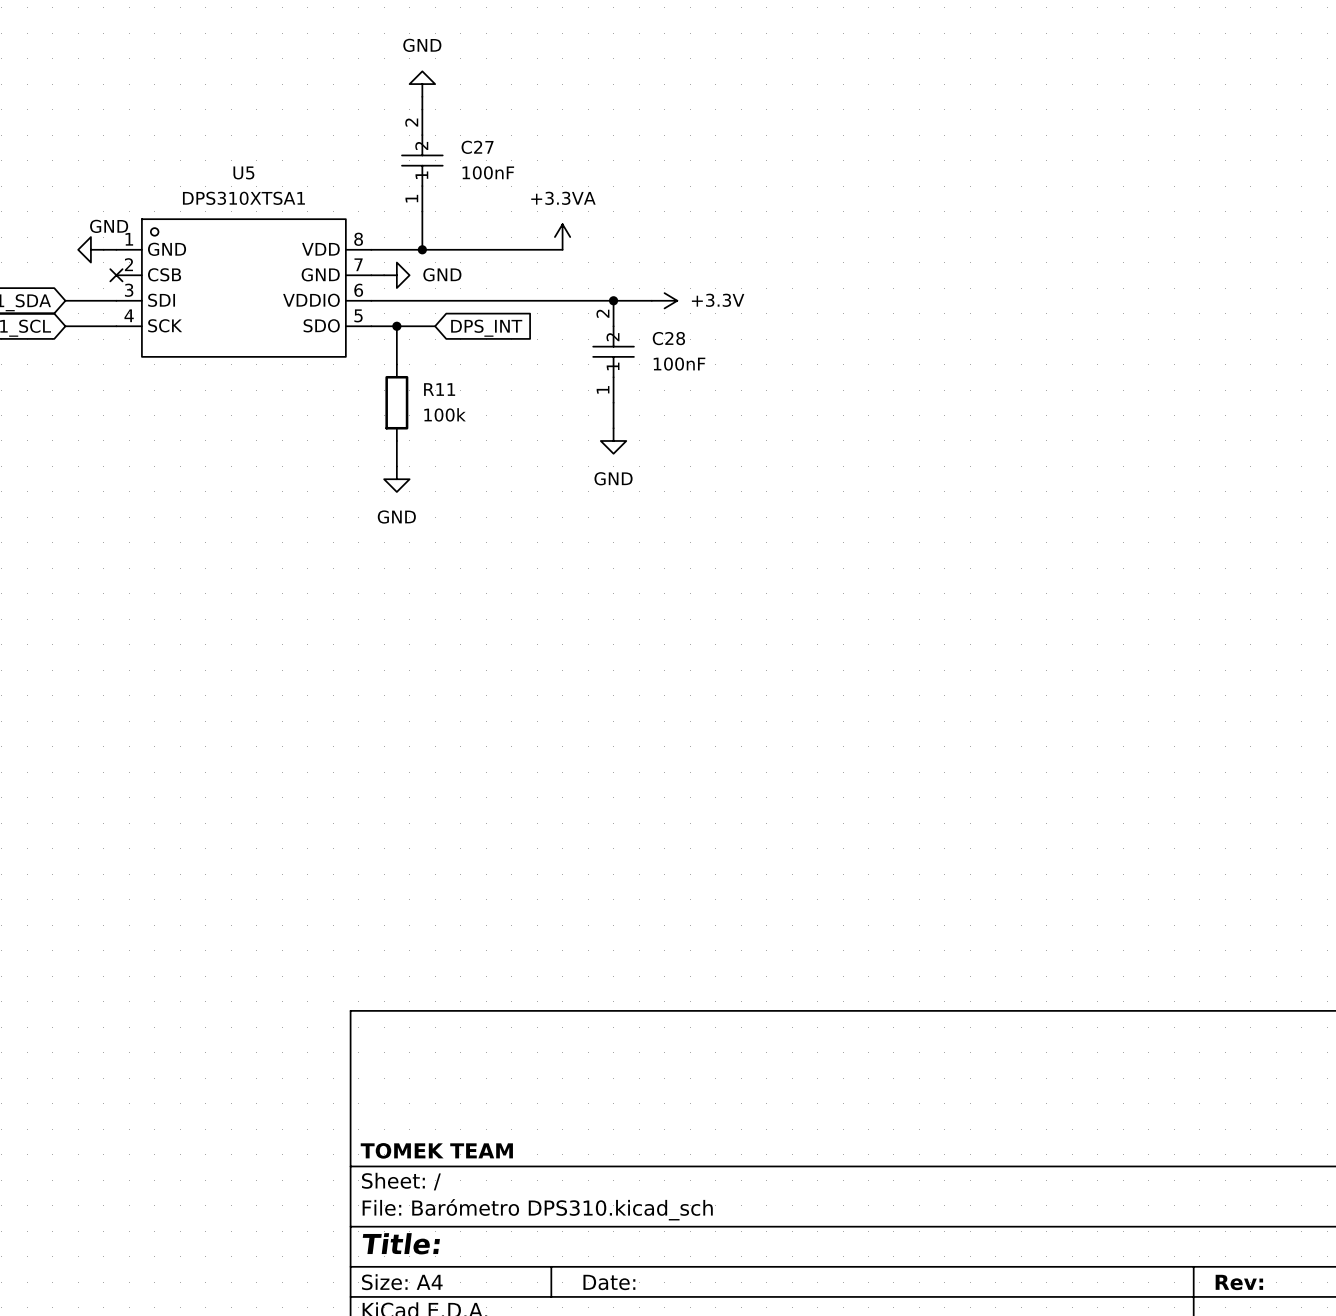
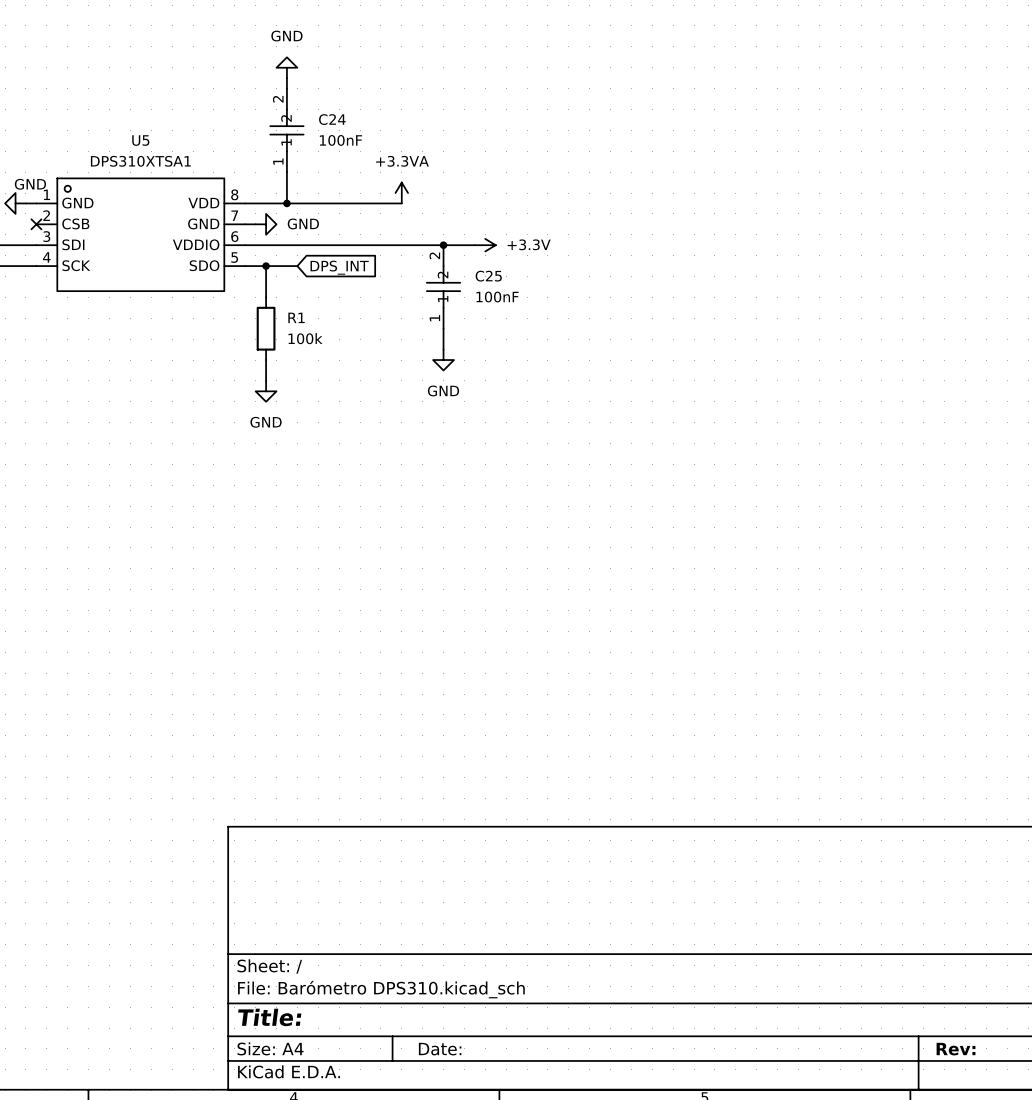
C27 name: C27 (477, 147) -> C24 (332, 119)
C28 name: C28 (668, 338) -> C25 (488, 276)
R11 name: R11 (439, 389) -> R1 (296, 317)
title block: TOMEK TEAM (436, 1150) -> none

